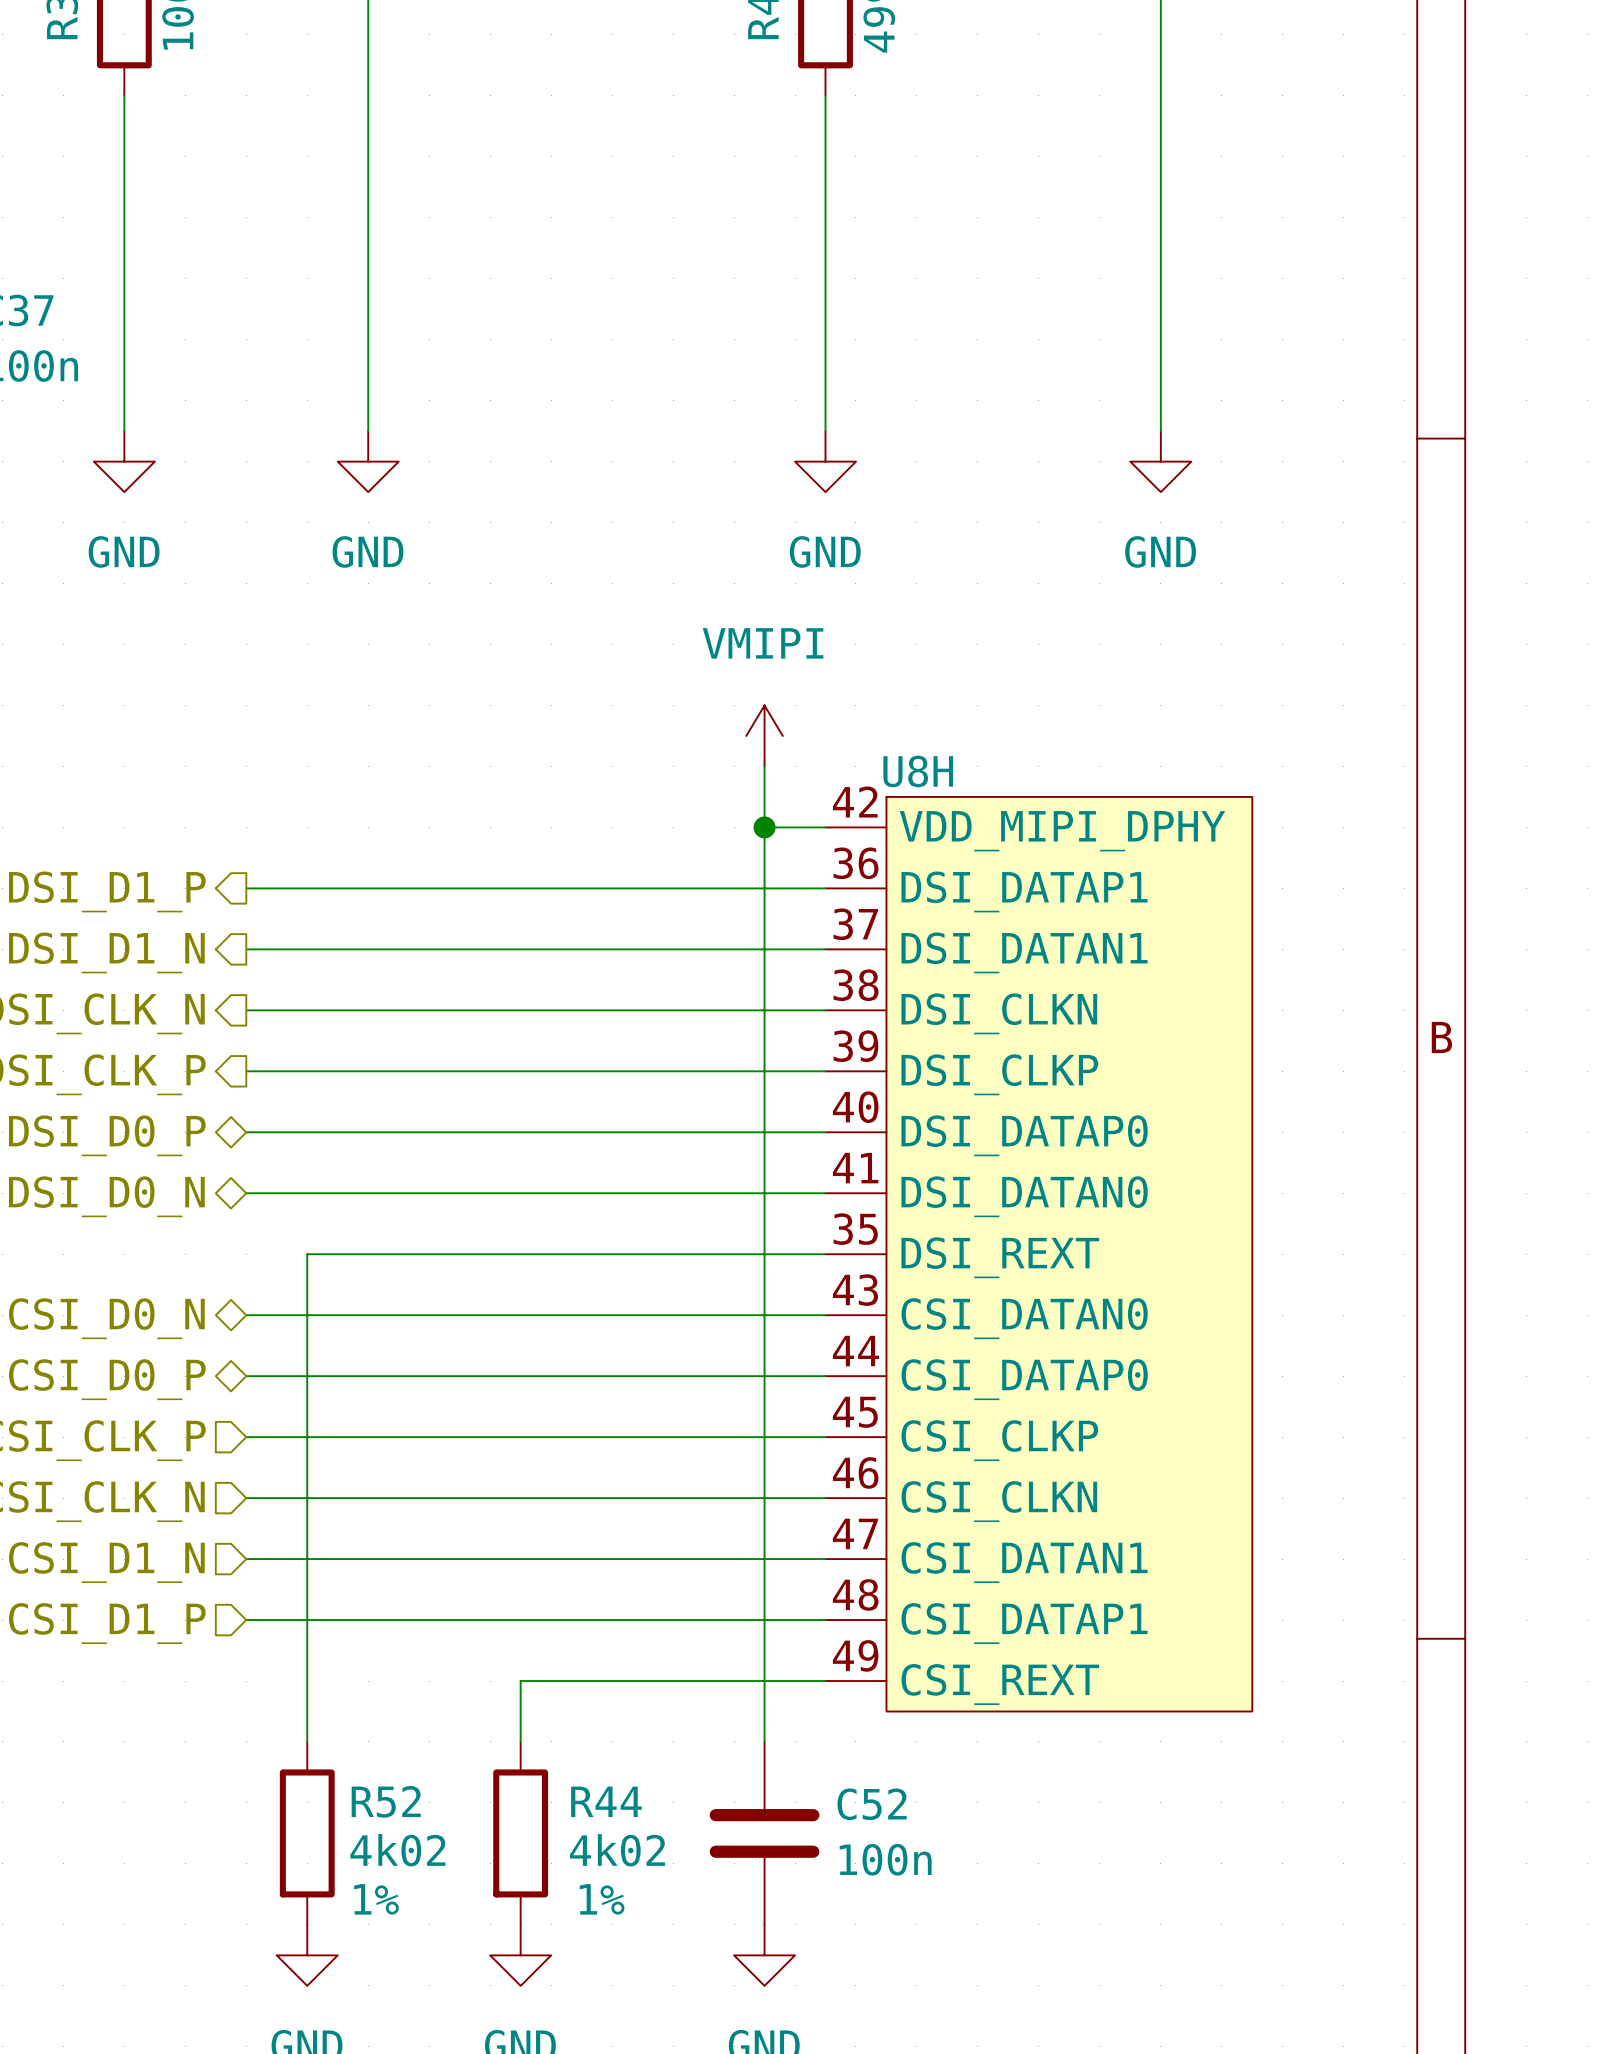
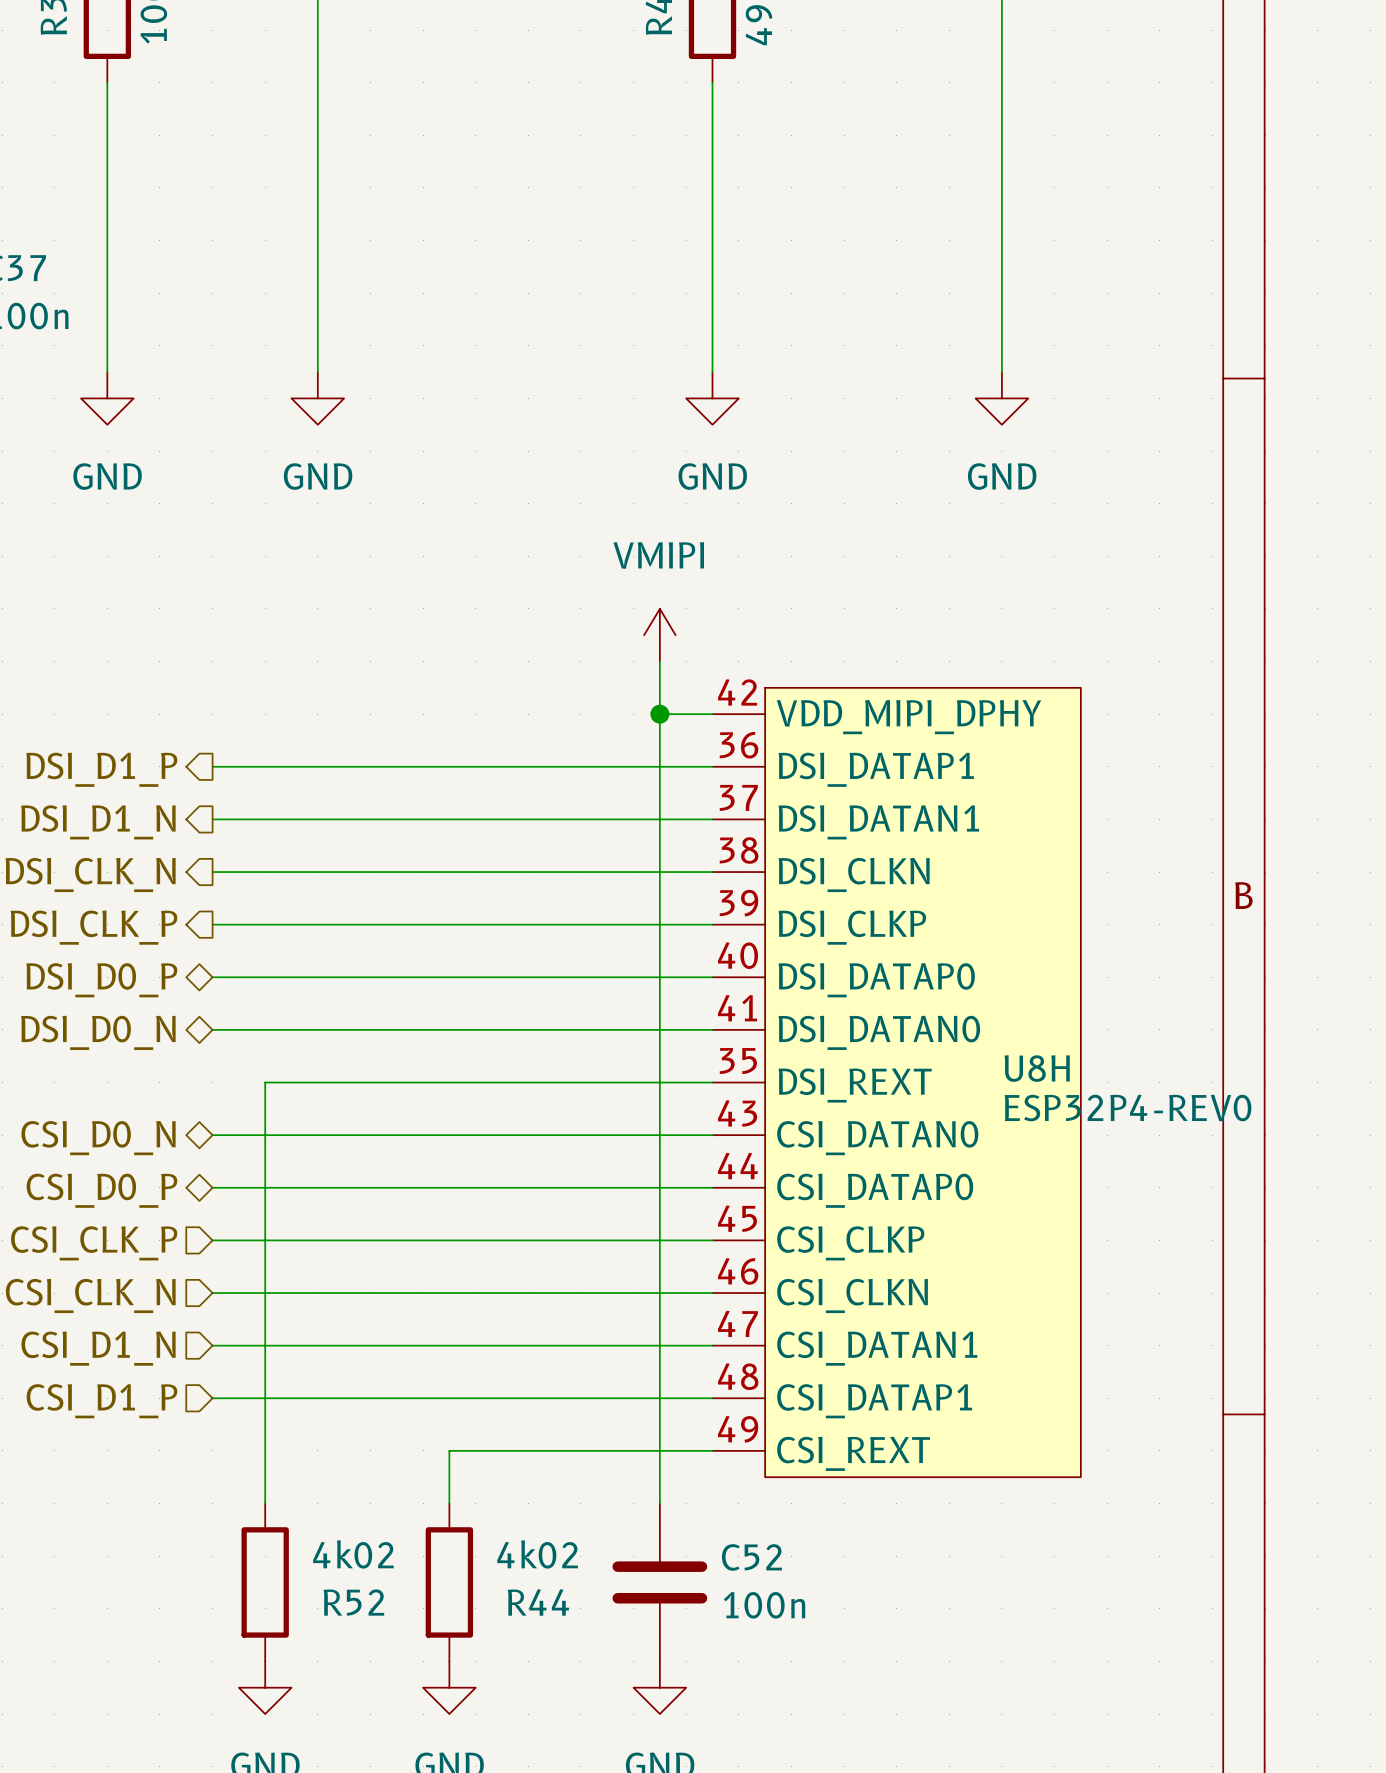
U8H name position: U8H (918, 771) -> U8H (1037, 1068)
U8H value: none -> ESP32P4-REV0 (1128, 1108)
R52 name position: R52 (386, 1801) -> R52 (353, 1602)
R44 name position: R44 (606, 1801) -> R44 (538, 1602)
R52 value position: 4k02 (397, 1850) -> 4k02 (353, 1554)
R44 value position: 4k02 (617, 1850) -> 4k02 (537, 1554)
R52 text: 1% (376, 1899) -> none
R44 text: 1% (602, 1899) -> none

